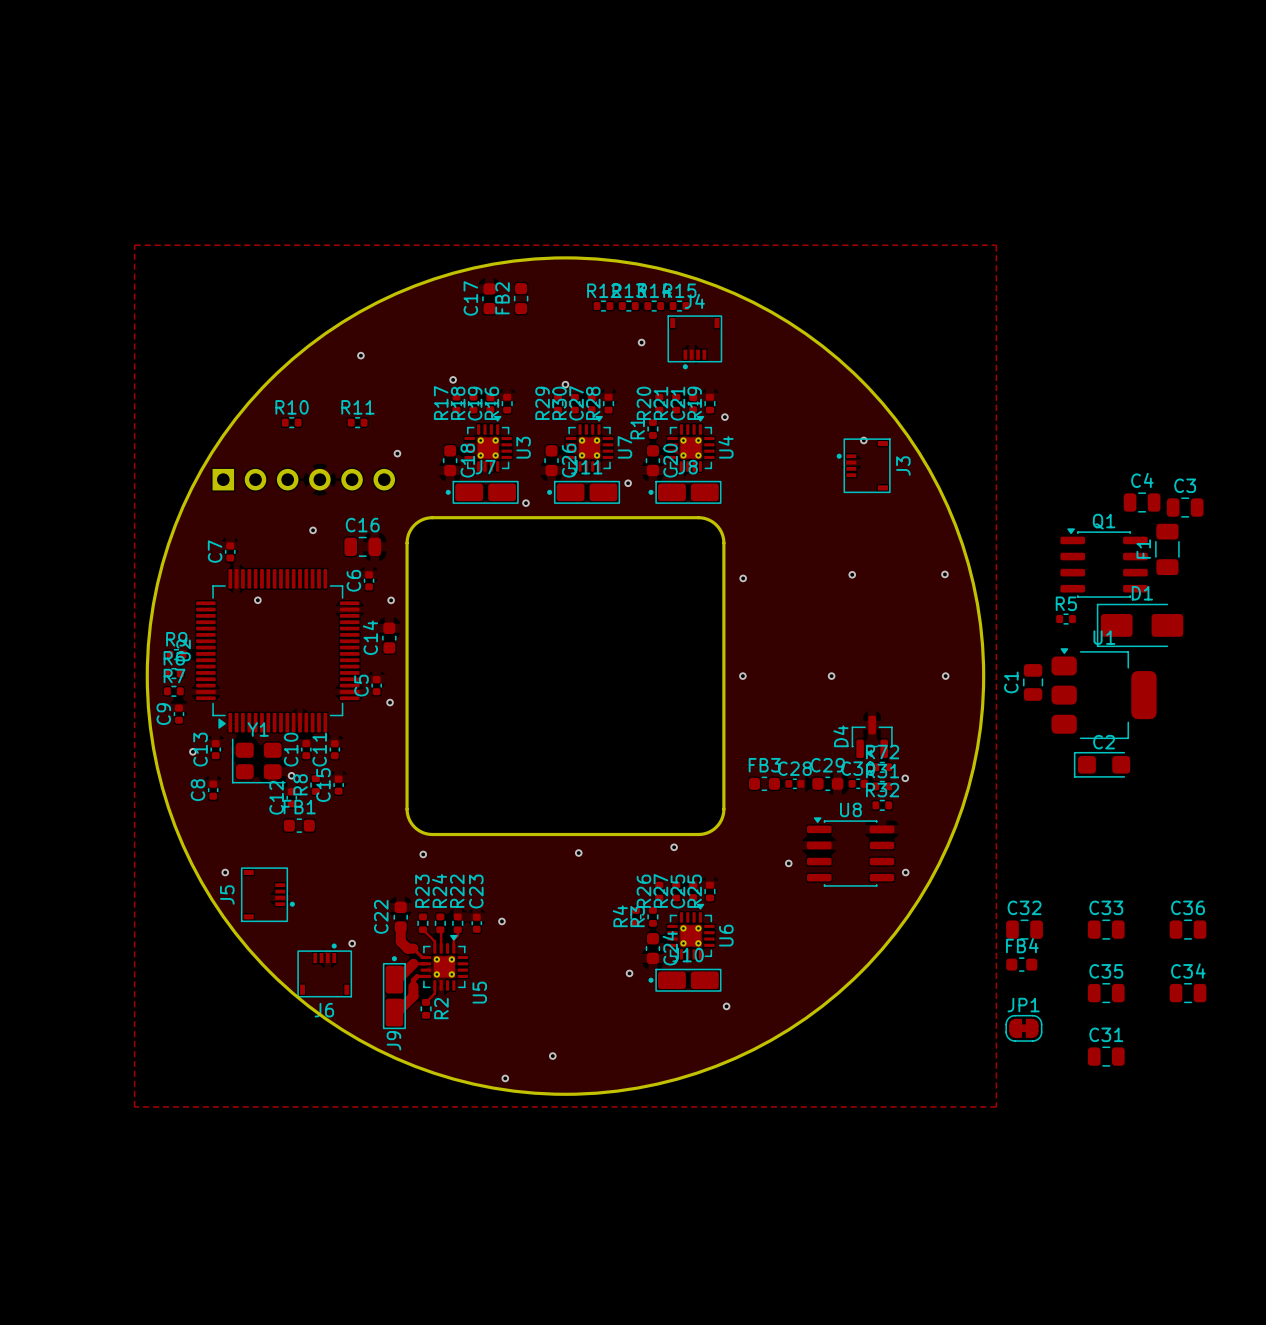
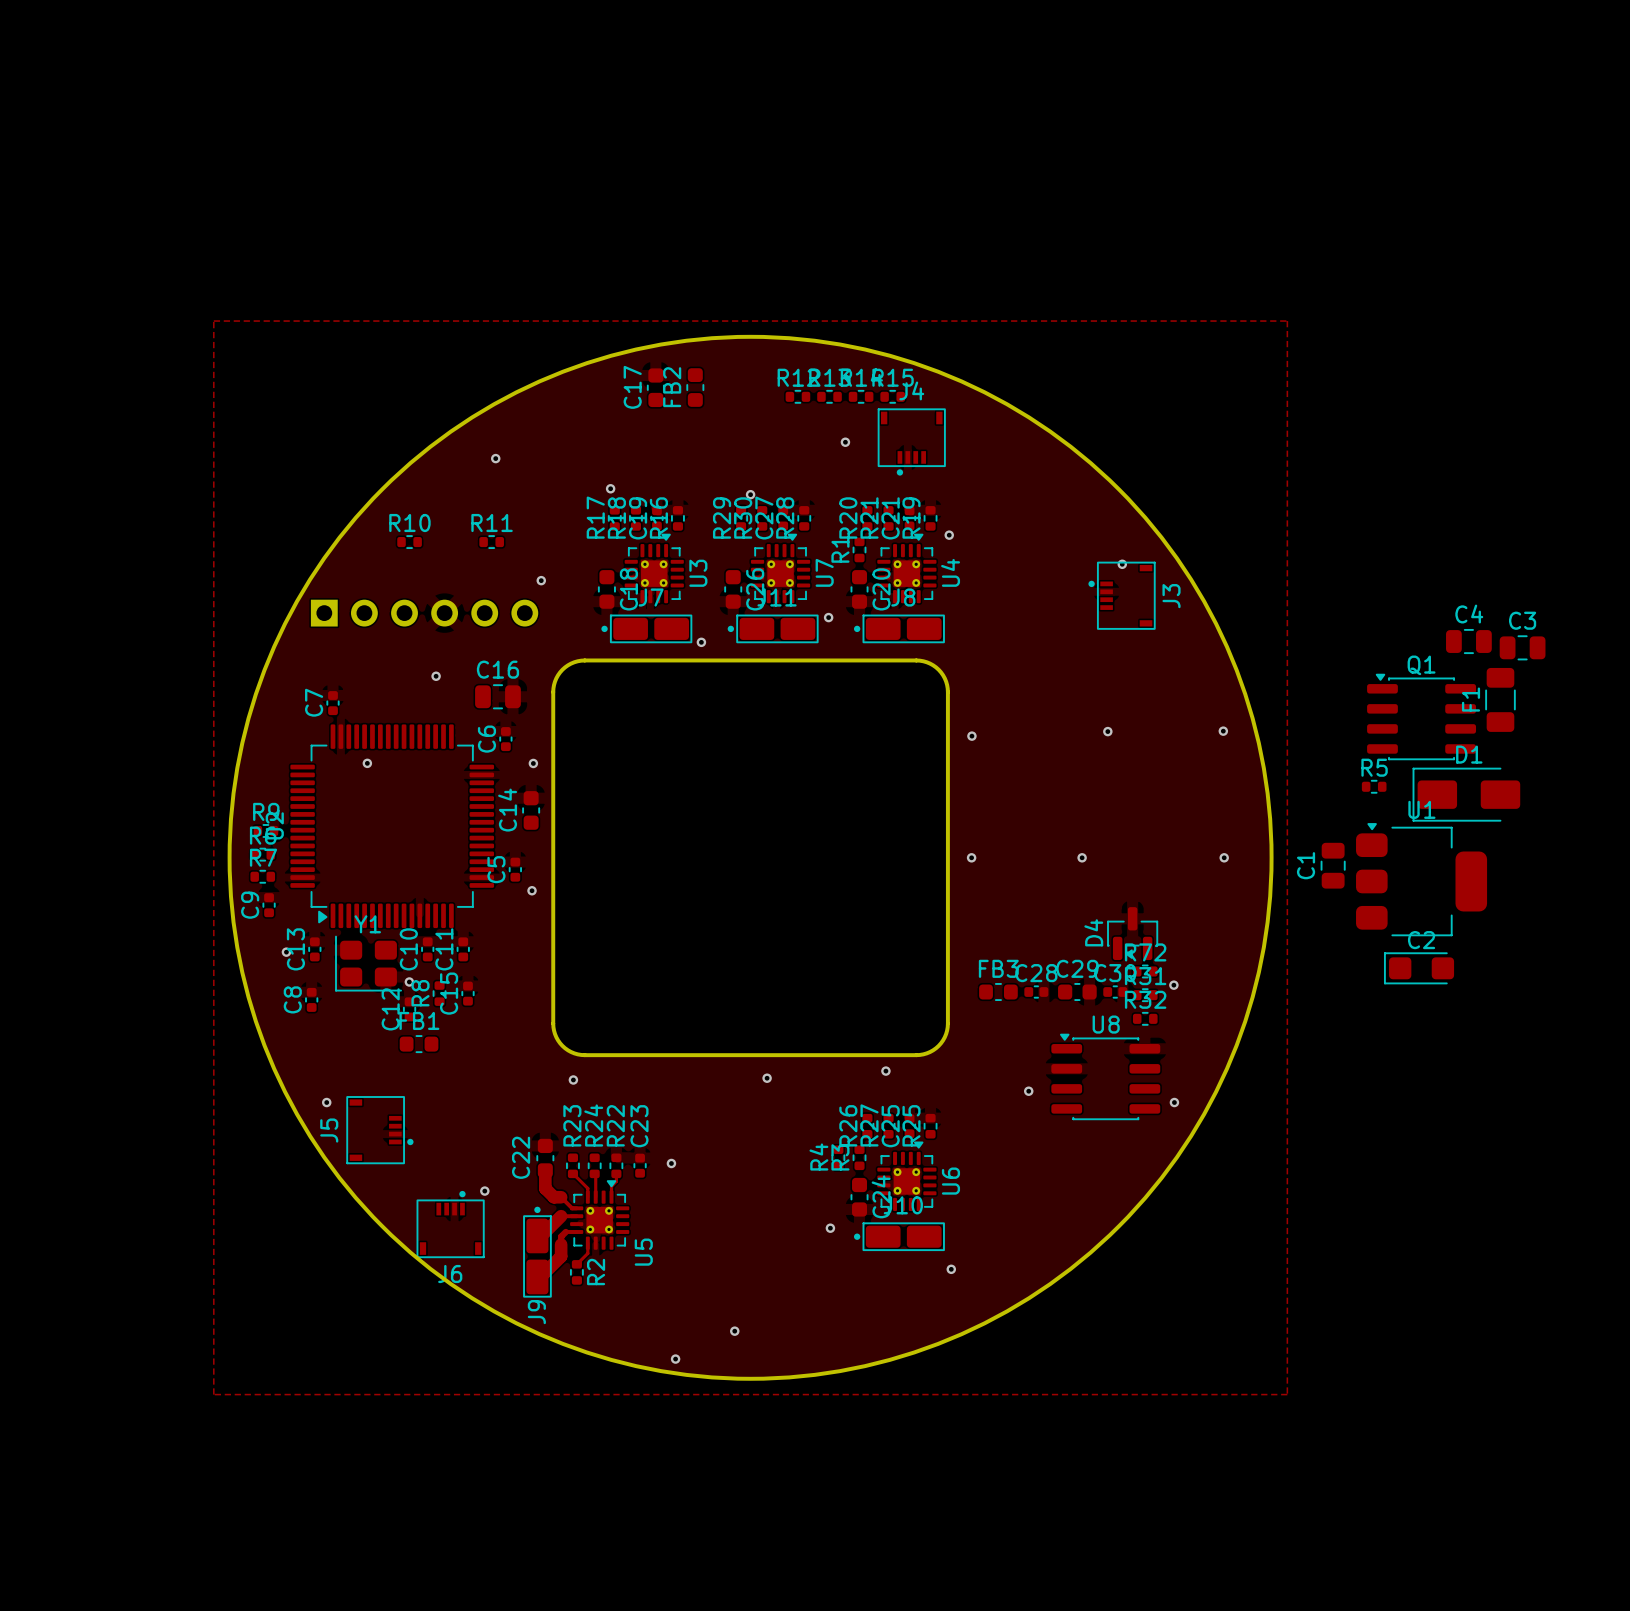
C32: (1024, 929) -> none
C33: (1106, 929) -> none
C36: (1188, 929) -> none
FB4: (1021, 964) -> none
C35: (1106, 993) -> none
C34: (1188, 993) -> none
JP1: (1023, 1028) -> none
C31: (1106, 1056) -> none

